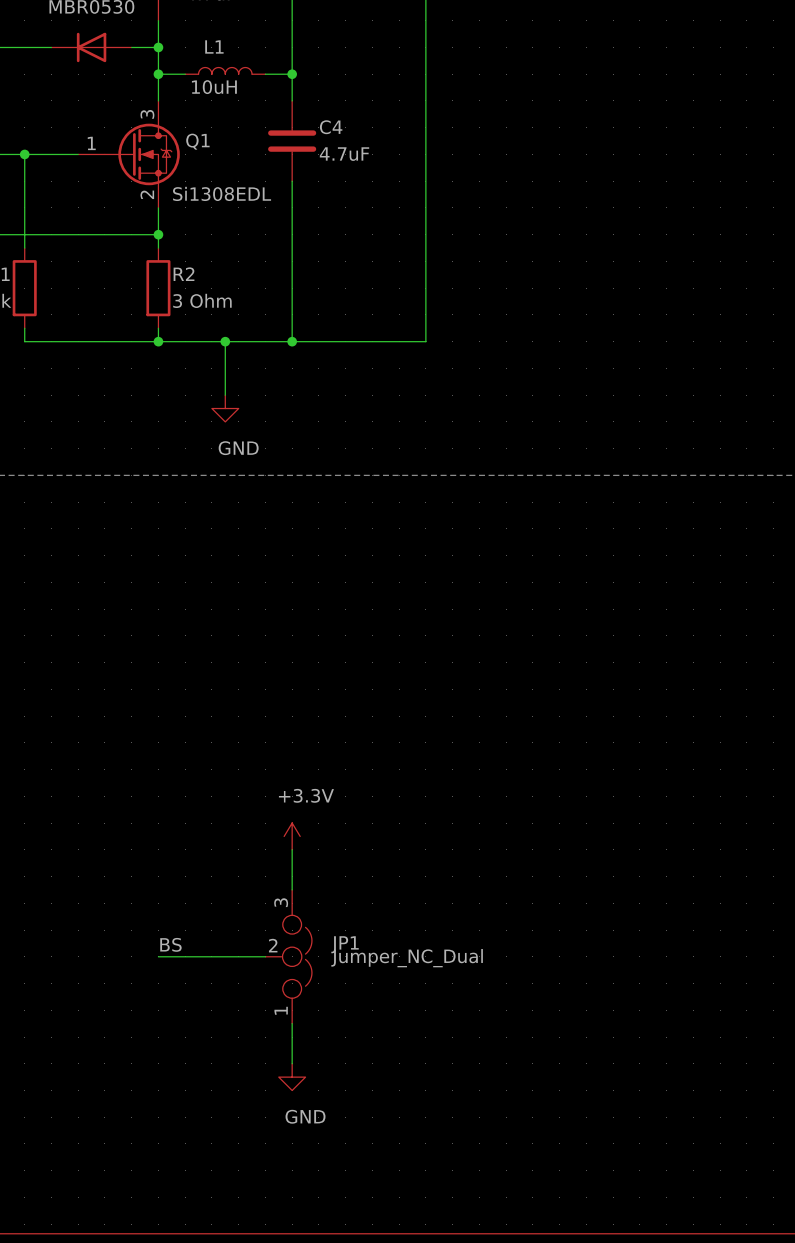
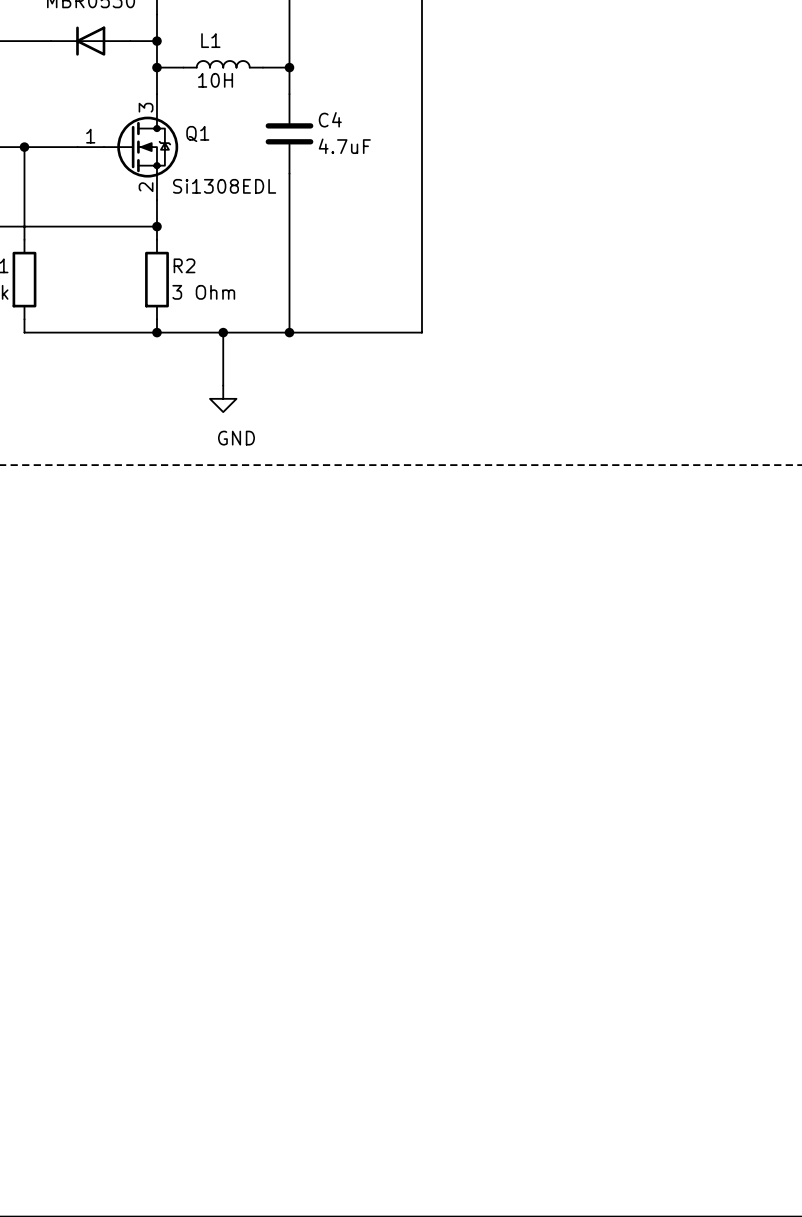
L1 value: 10uH (214, 87) -> 10H (215, 80)
power symbol: +3.3V (292, 836) -> none
wire: (292, 849) (292, 889) -> none
label: BS (170, 944) -> none
wire: (158, 956) (265, 956) -> none
JP1: Jumper_NC_Dual (288, 956) -> none
wire: (292, 1023) (292, 1063) -> none
power symbol: GND (292, 1077) -> none

